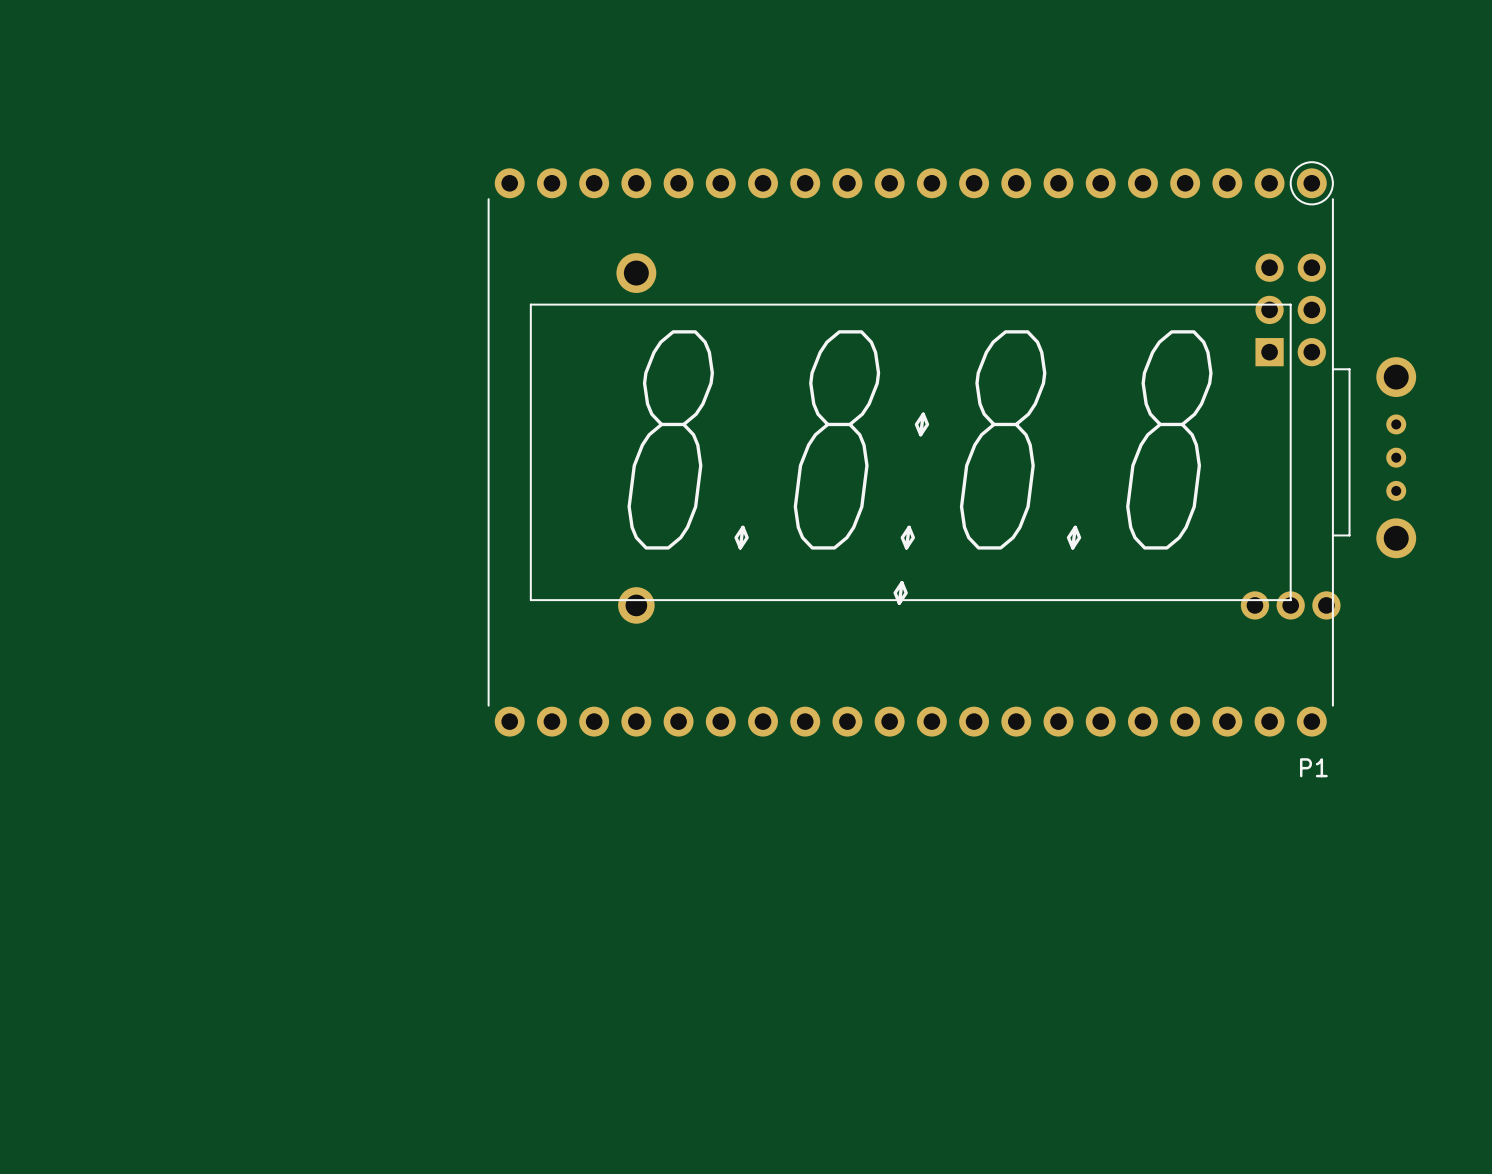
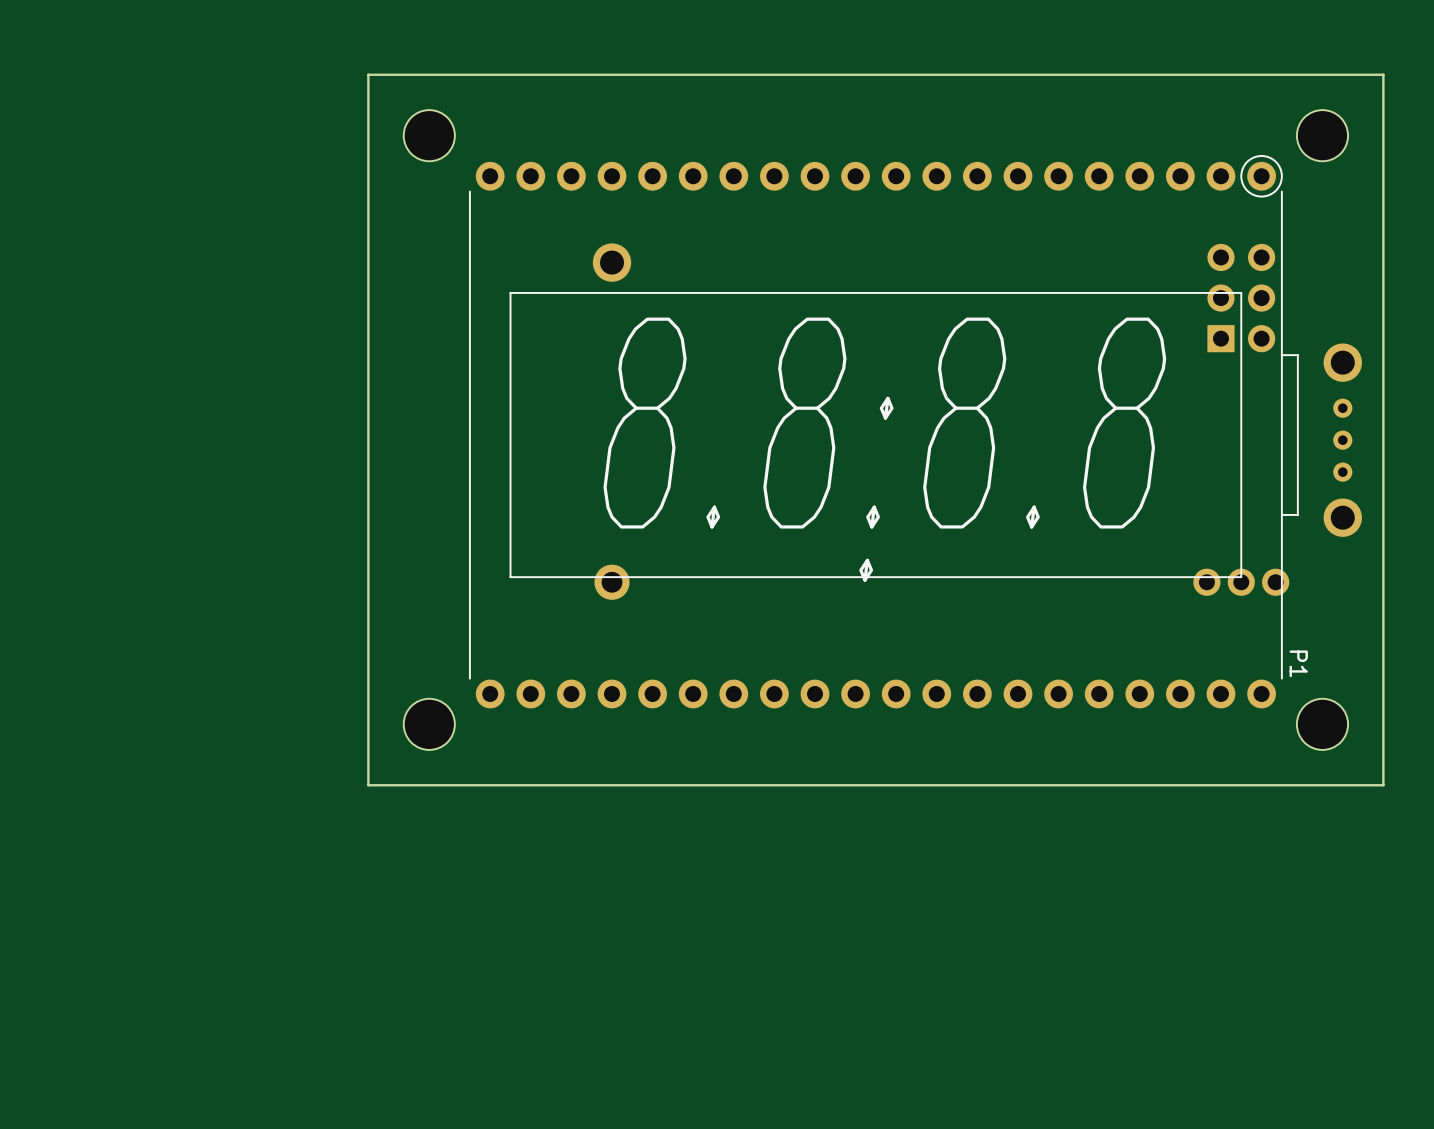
board edge: none -> (1383, 74) (368, 74) (368, 785) (1383, 785) (1383, 74)
part: none -> (429, 135)
part: none -> (1322, 135)
part: none -> (429, 724)
part: none -> (1322, 724)
P1 name rotation: 0° (1313, 767) -> 90° clockwise (1298, 663)
P1 name position: P1 (1313, 767) -> P1 (1298, 663)

